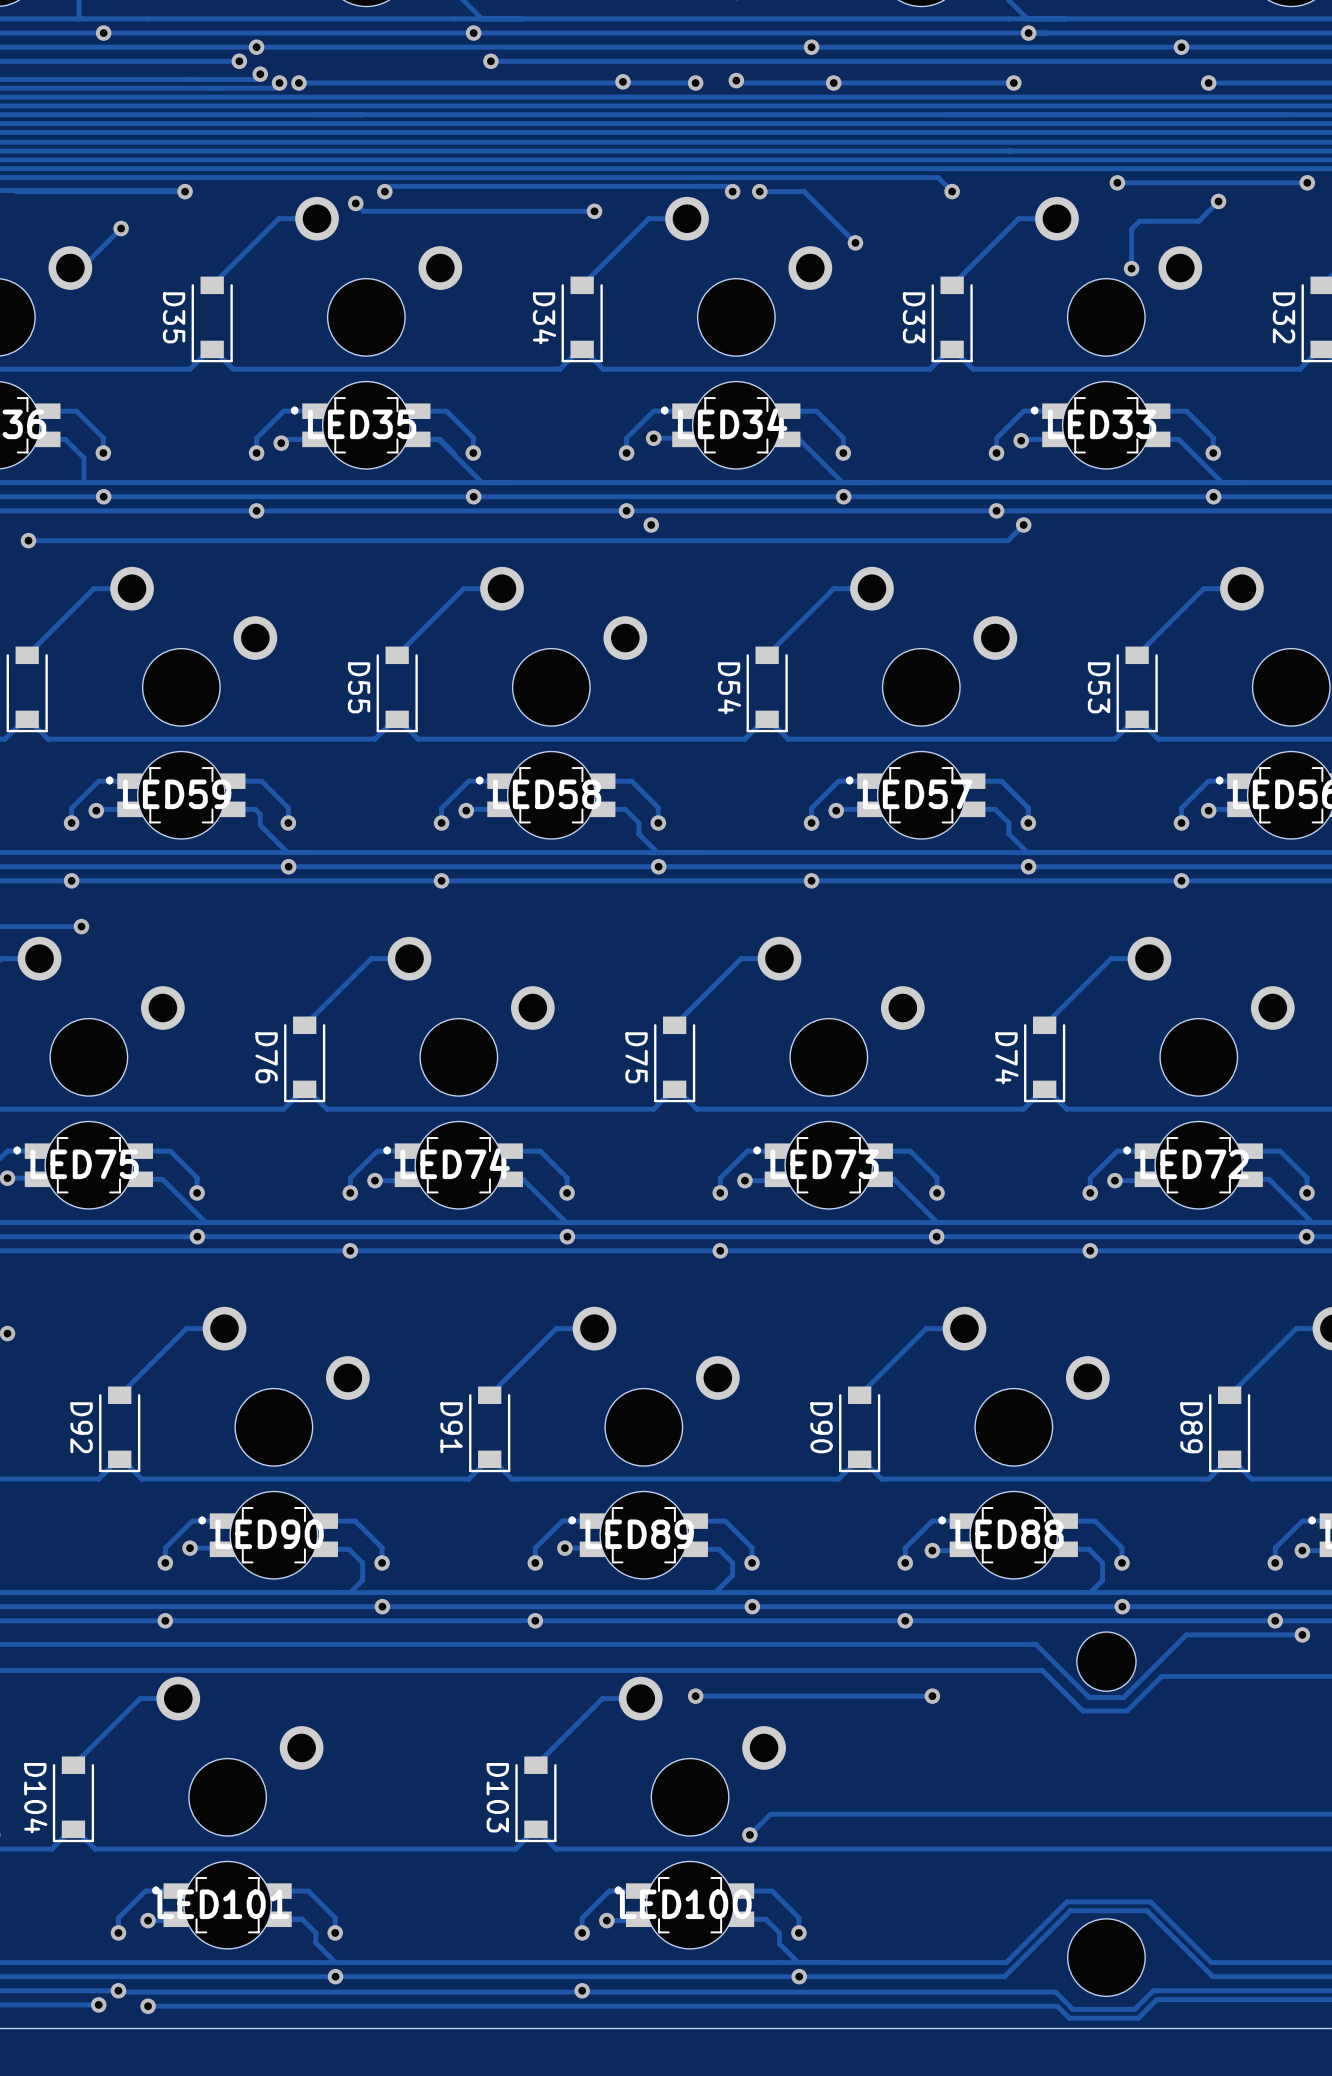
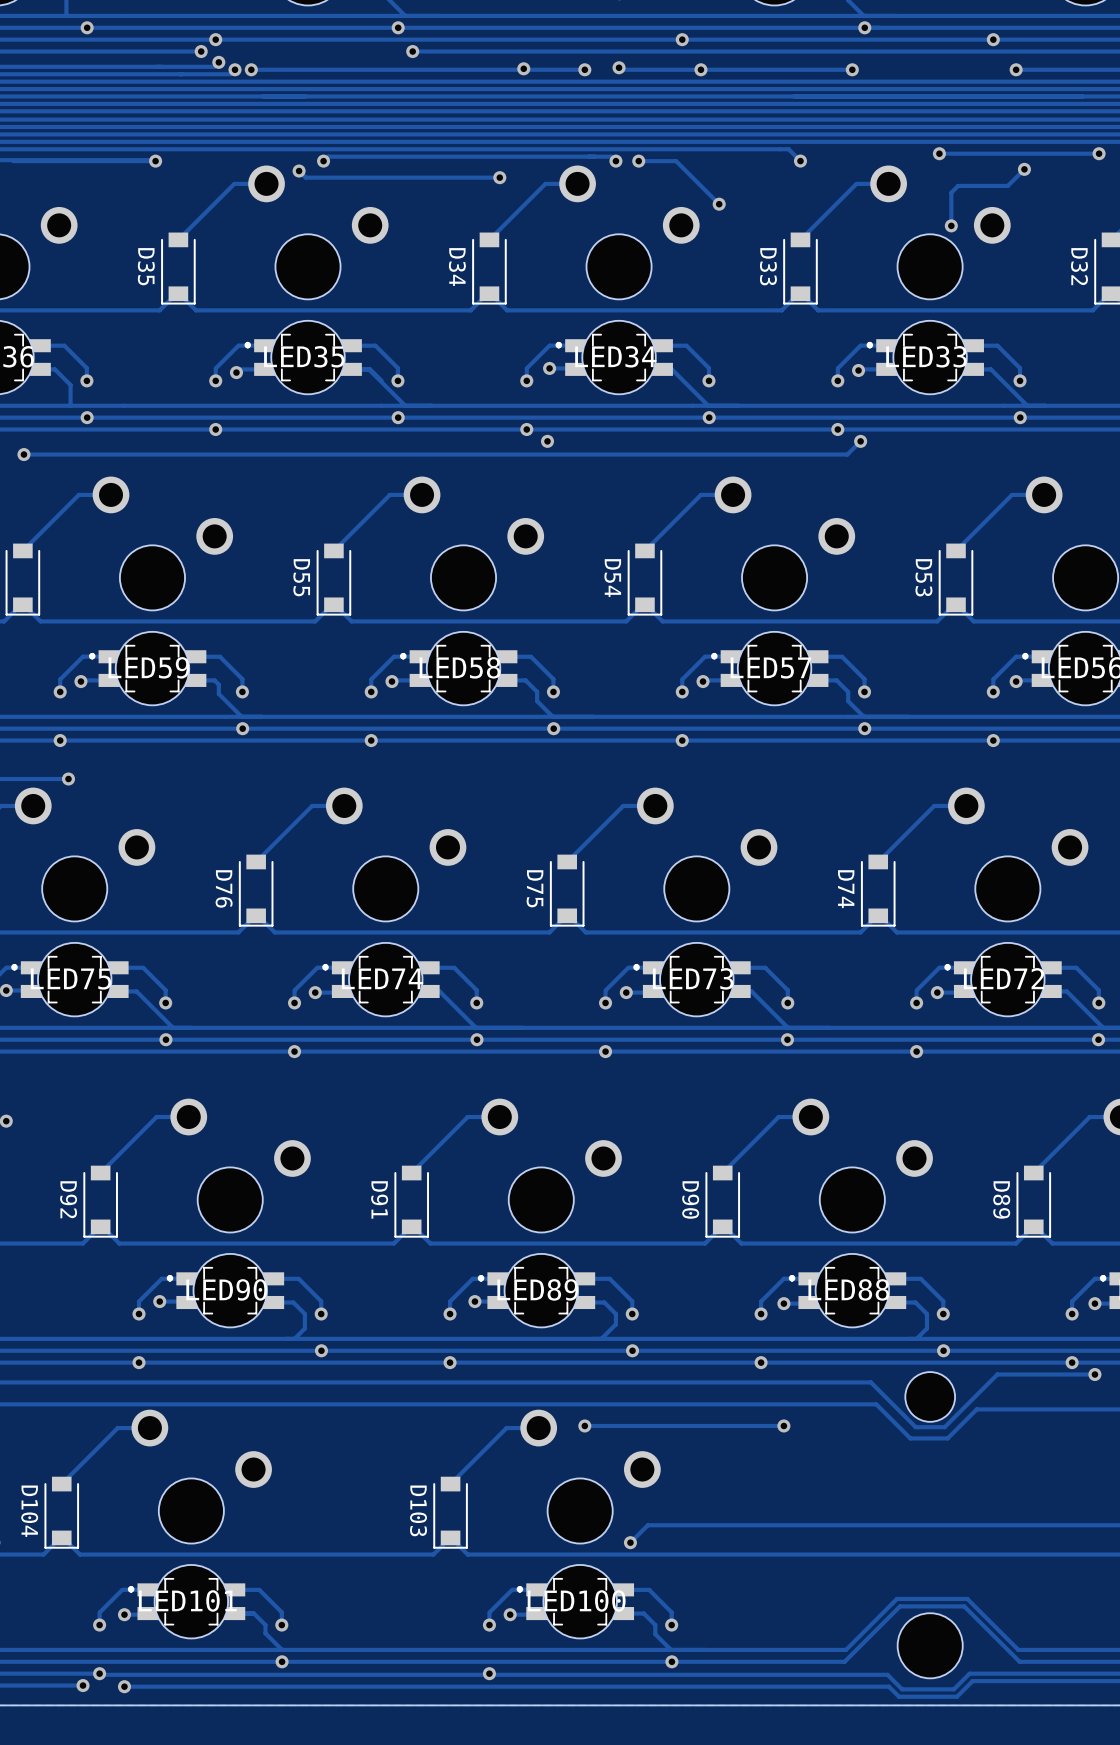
track: (121, 228) (81, 268) (70, 268) -> none
via: (121, 228) -> none

